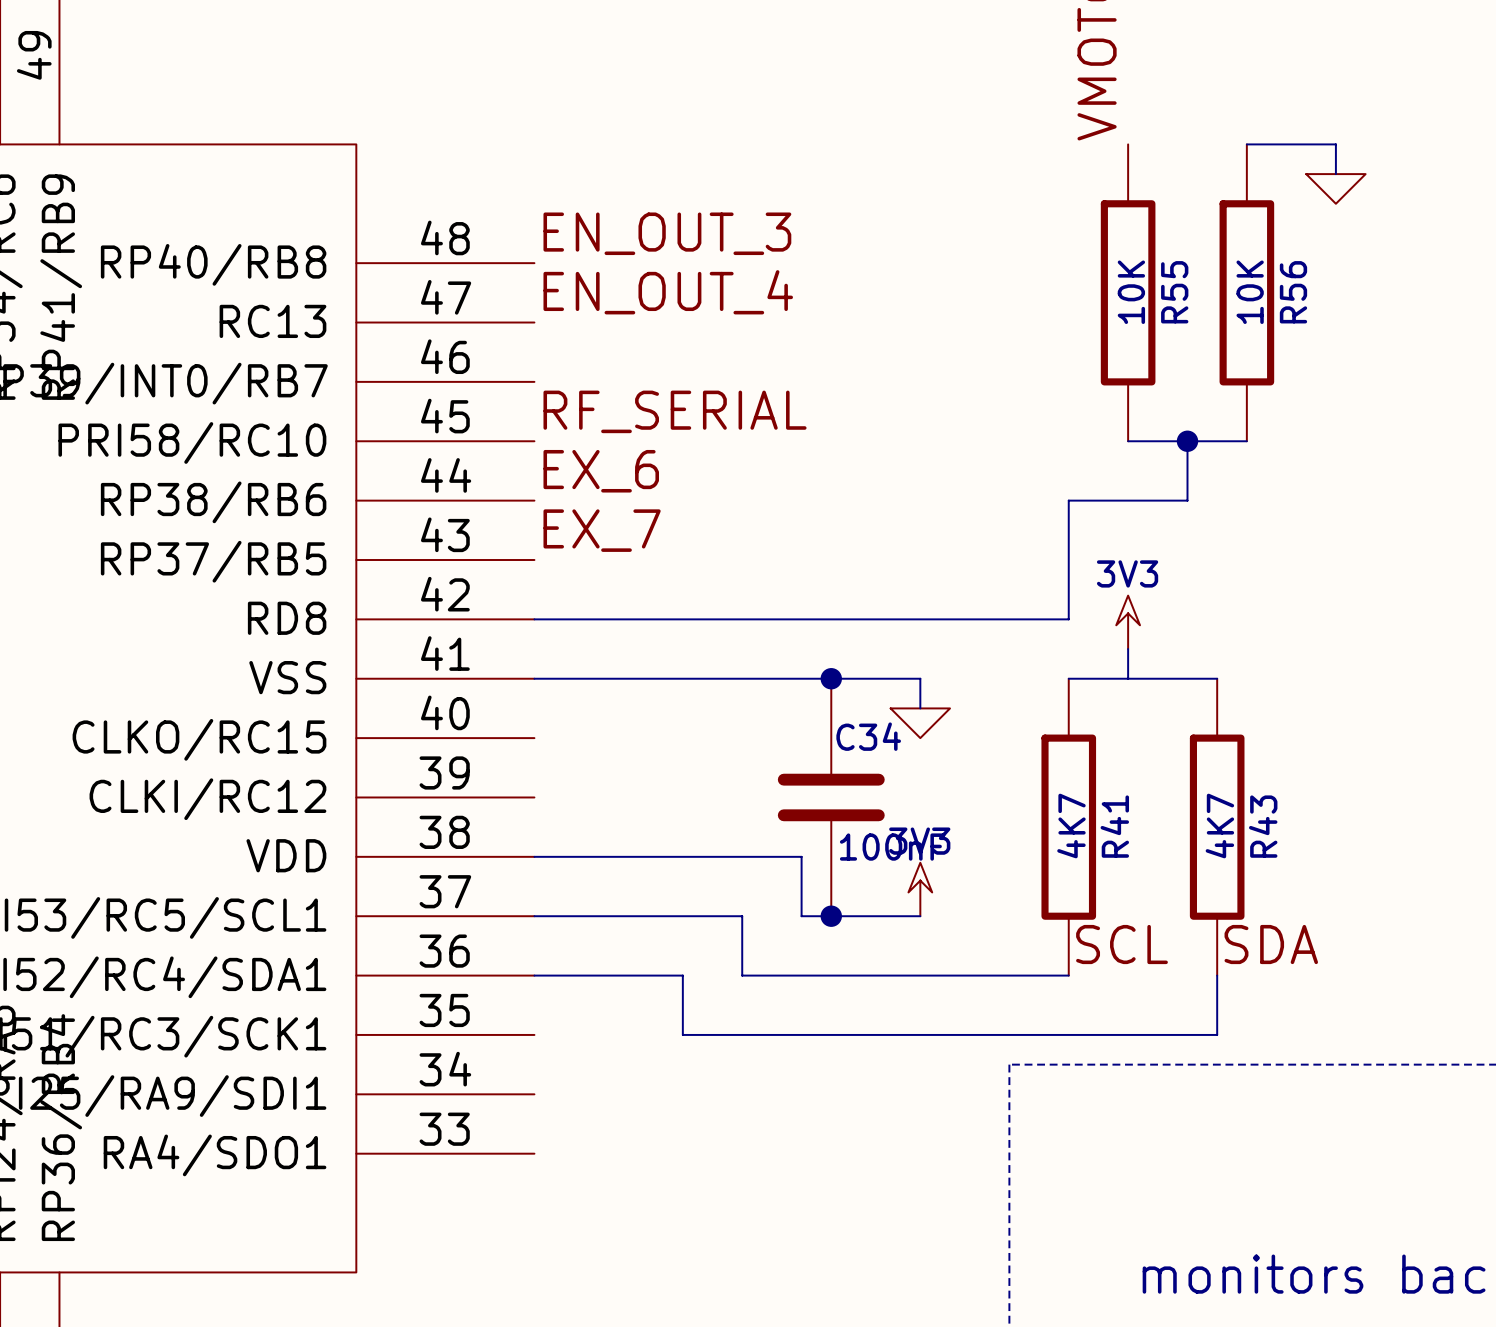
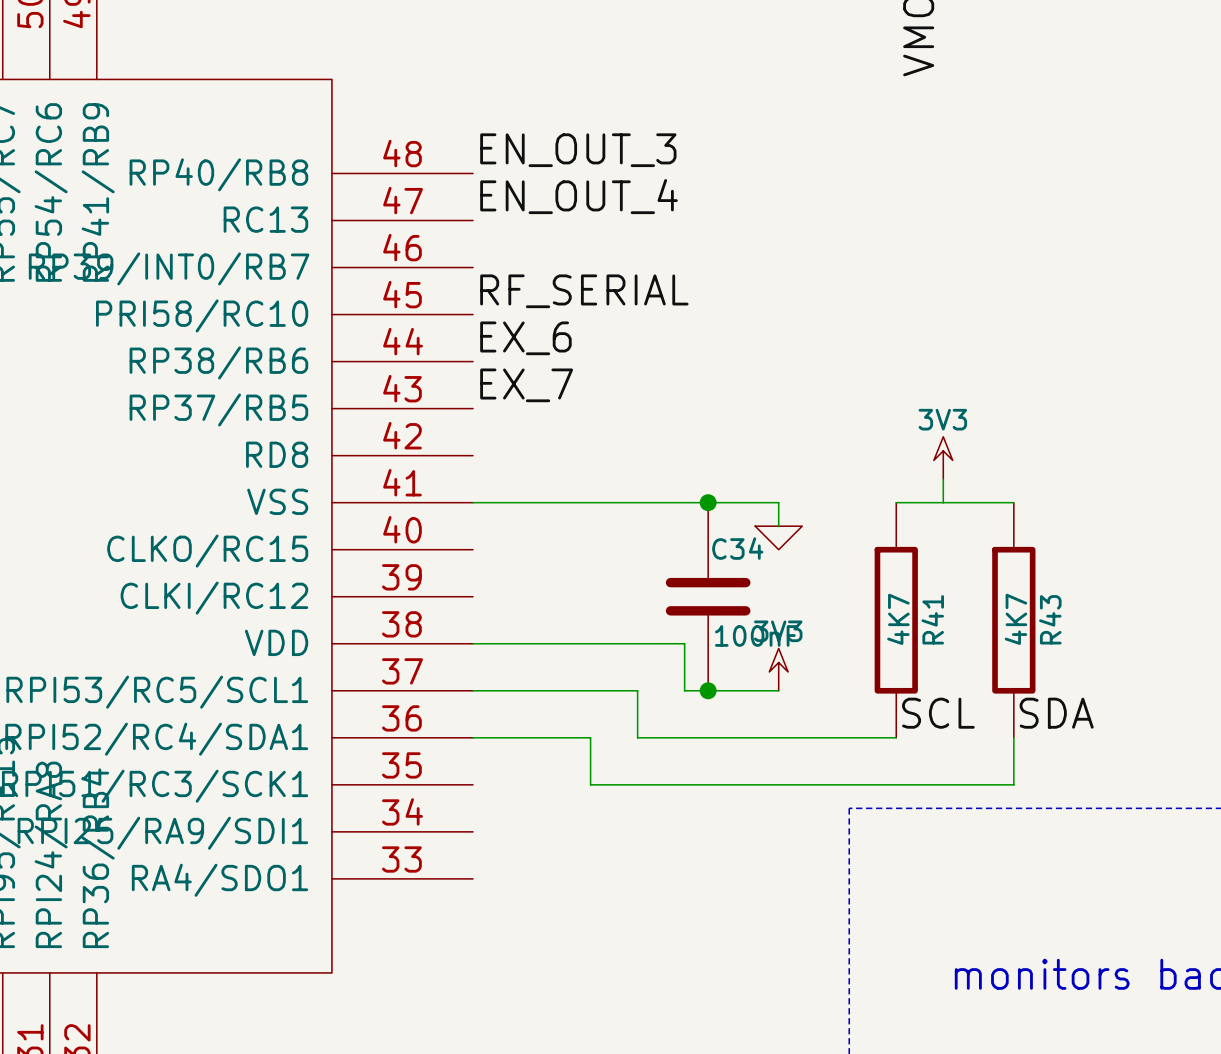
wire: (1246, 144) (1335, 144) (1335, 174) -> none
power symbol: (1335, 188) -> none
R55: 10K (1128, 292) -> none
R56: 10K (1246, 292) -> none
wire: (1128, 441) (1246, 441) -> none
wire: (1187, 441) (1187, 500) (1068, 500) (1068, 619) (534, 619) -> none
junction: (1187, 441) -> none

